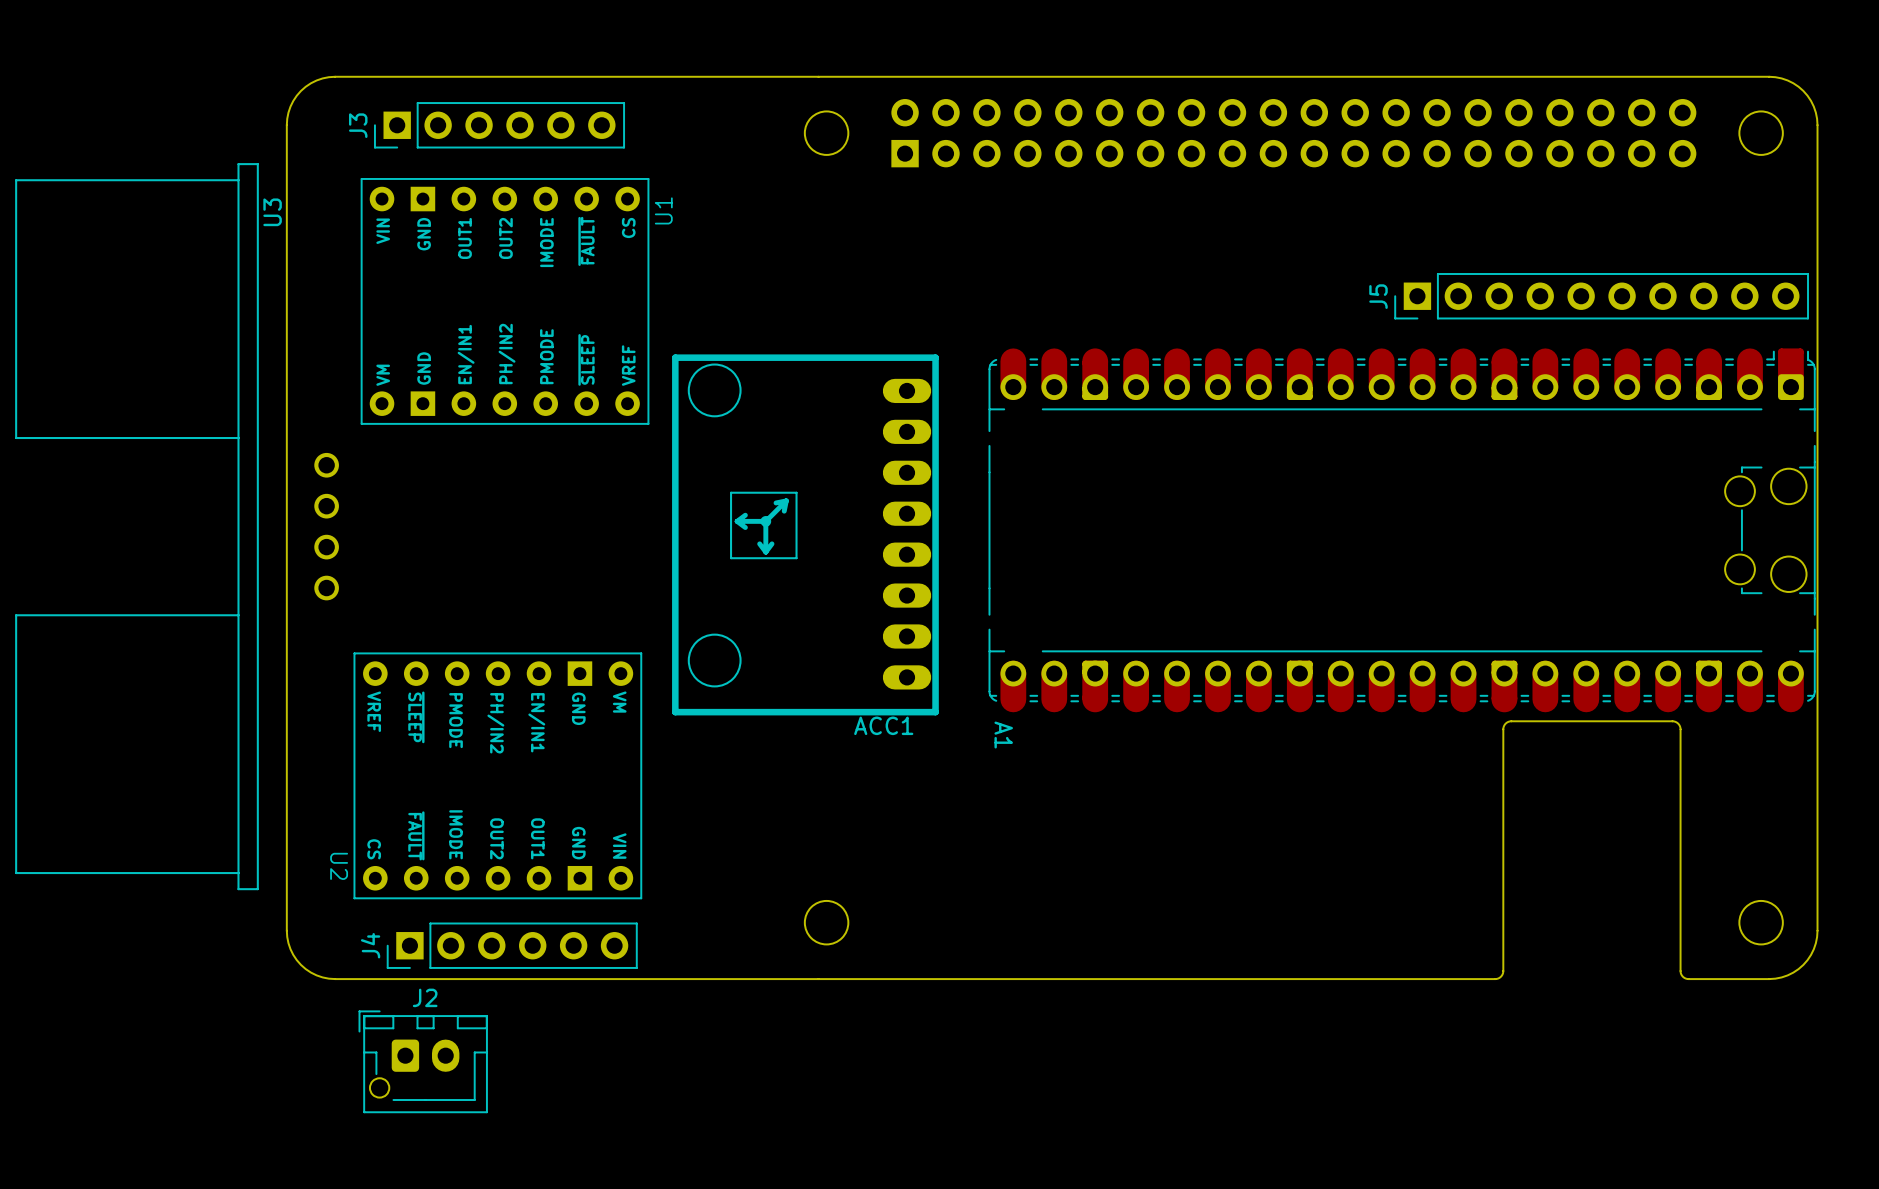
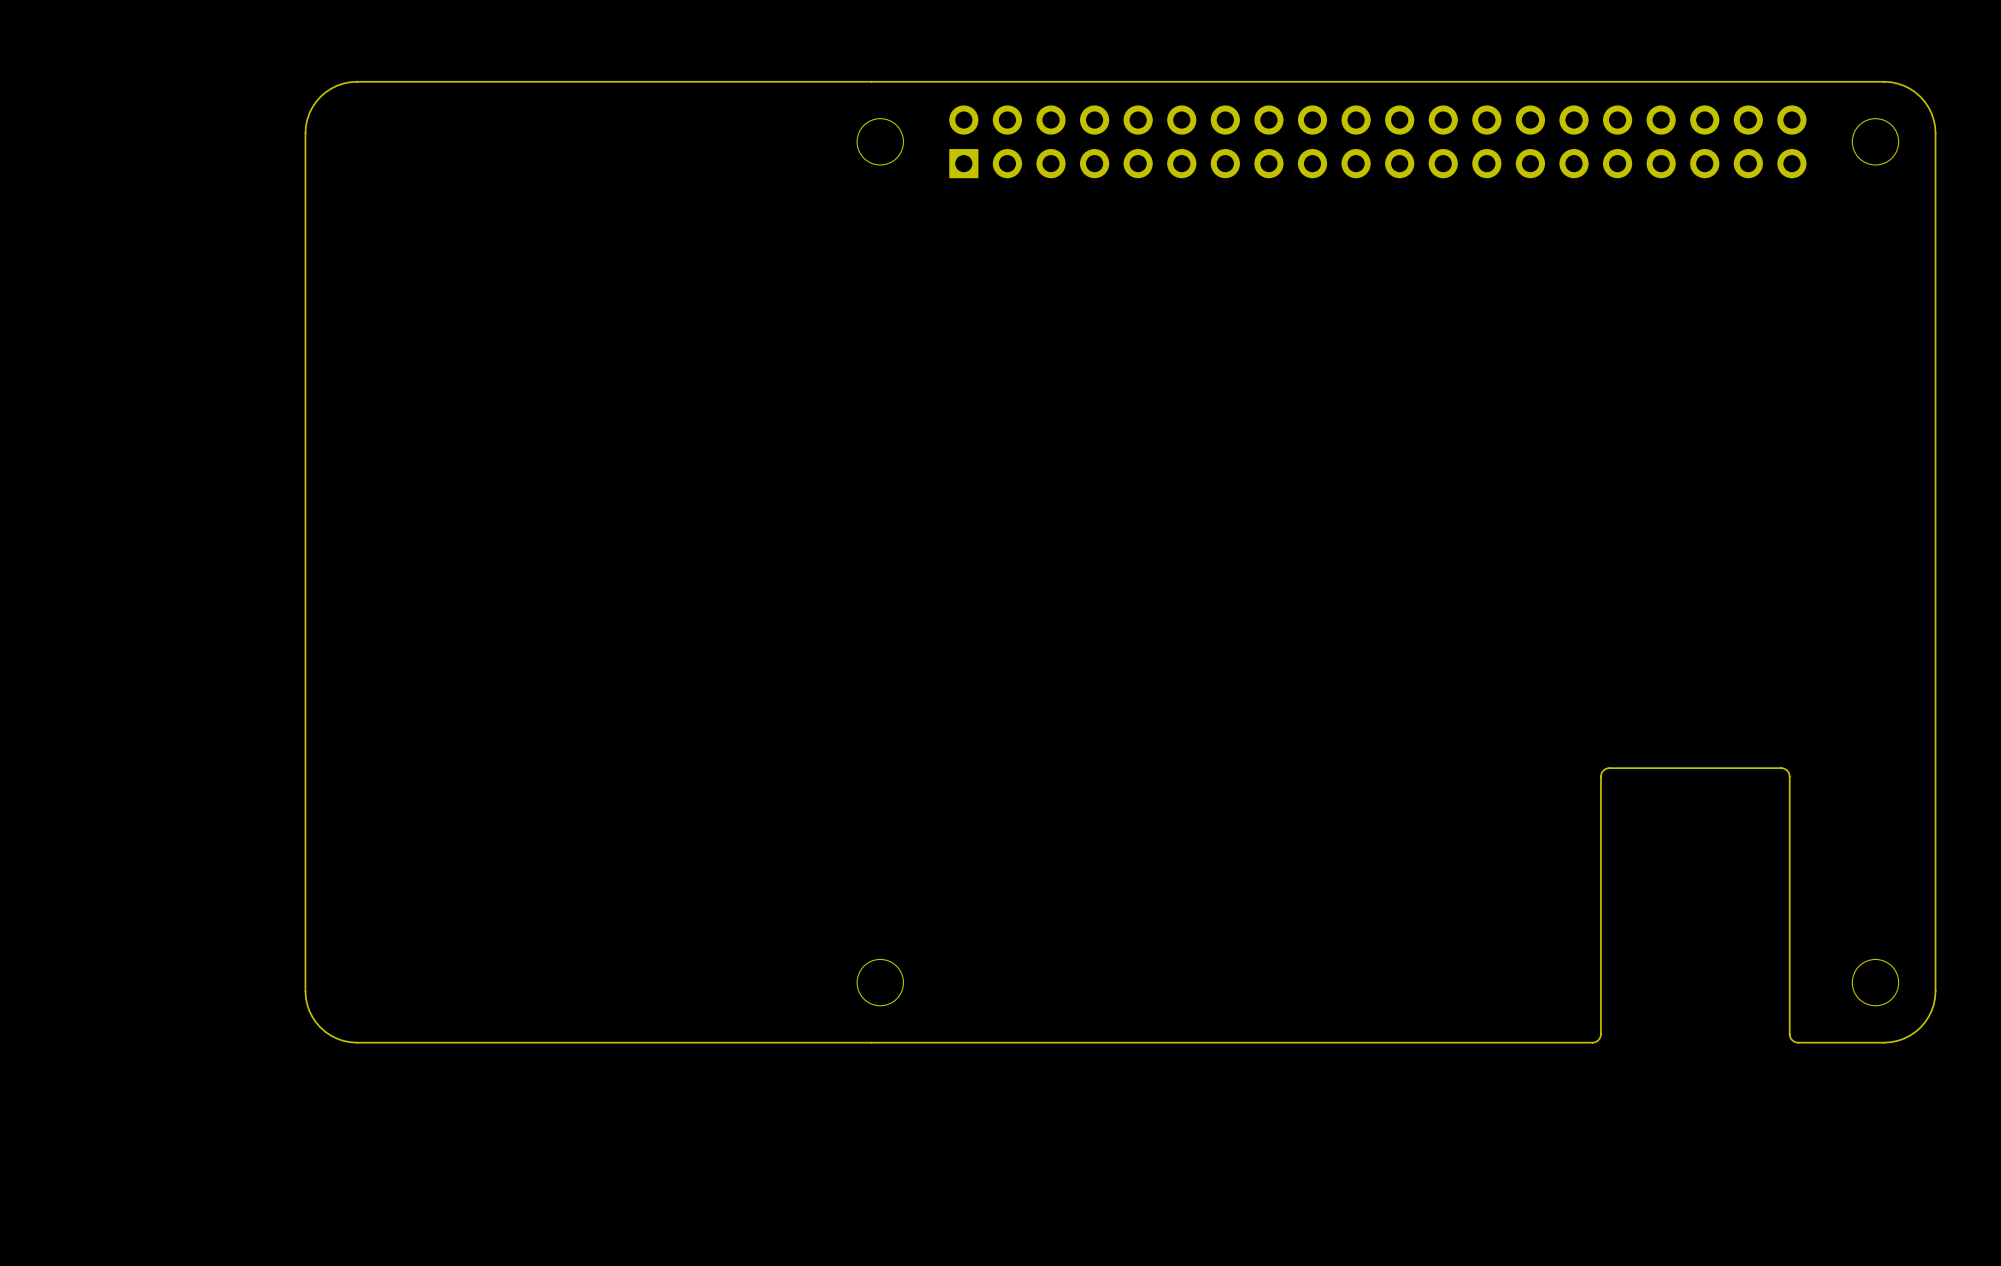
J3: (499, 125) -> none
J5: (1601, 296) -> none
U1: (505, 301) -> none
U3: (177, 526) -> none
A1: (1402, 530) -> none
ACC1: (805, 534) -> none
U2: (497, 775) -> none
J4: (512, 945) -> none
J2: (423, 1061) -> none

